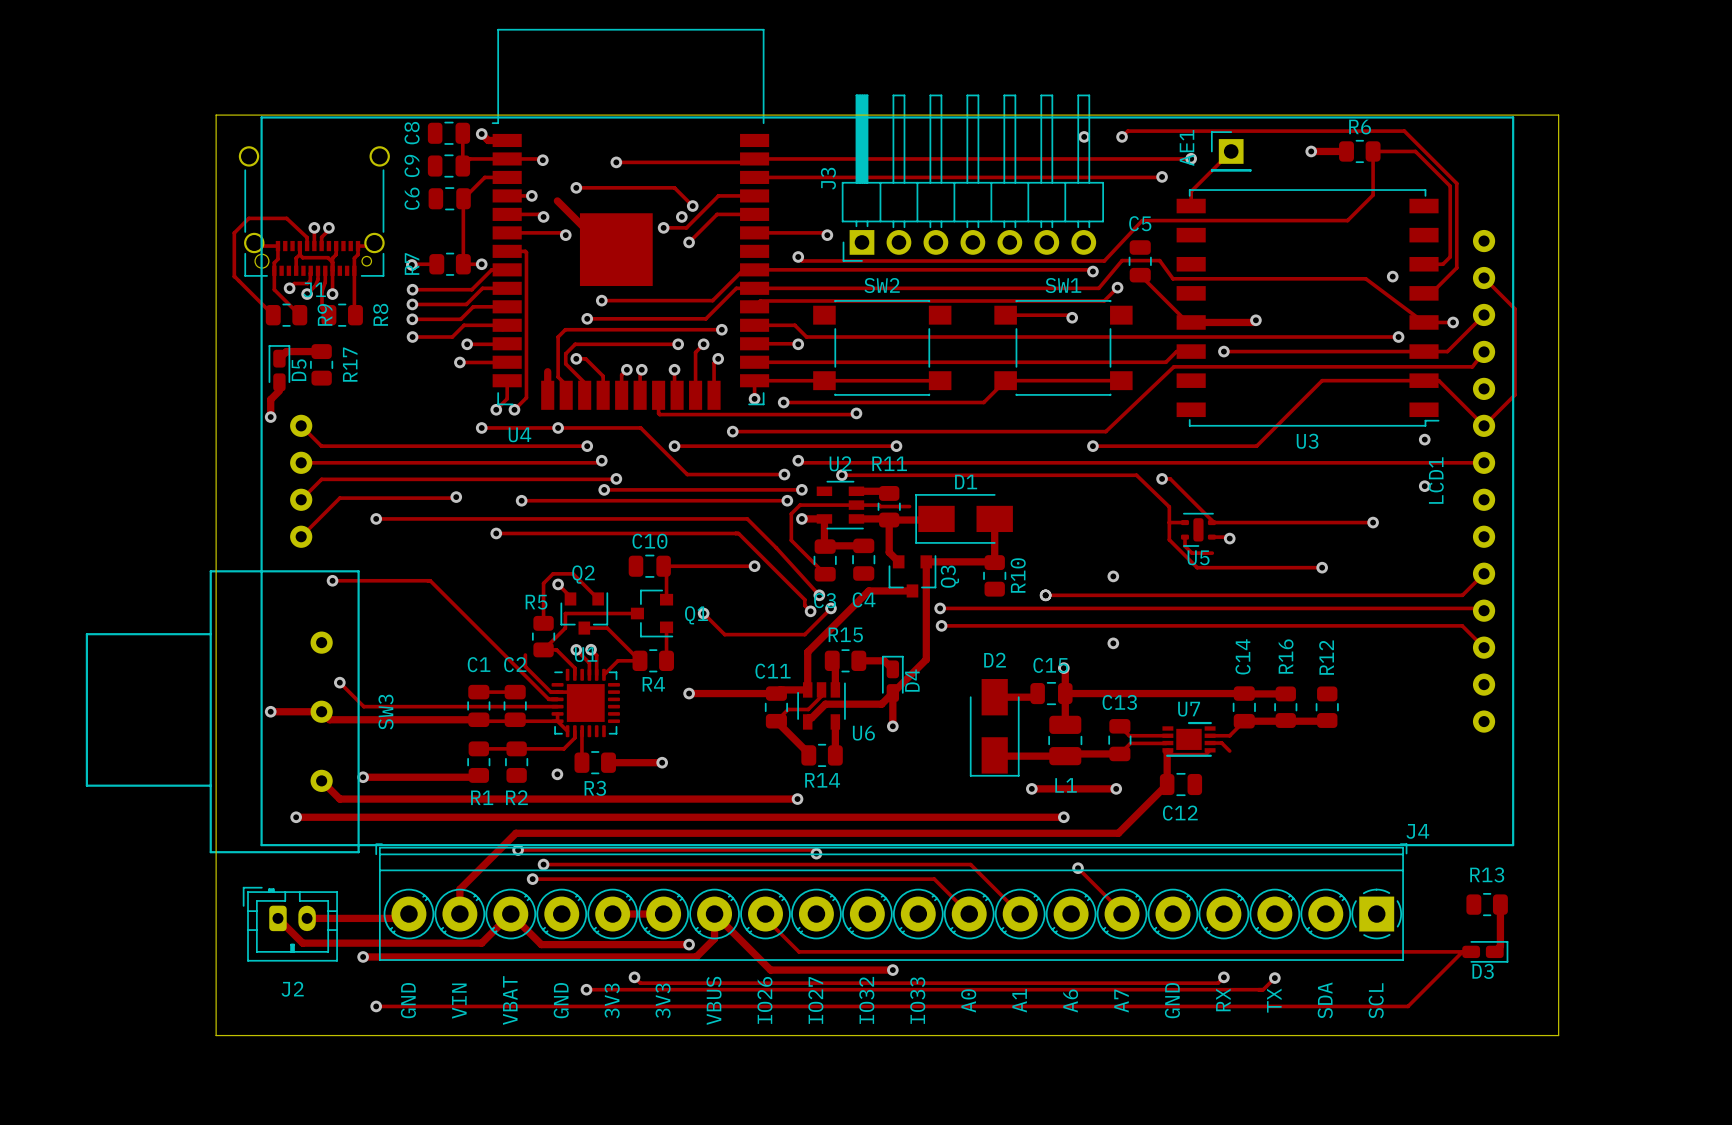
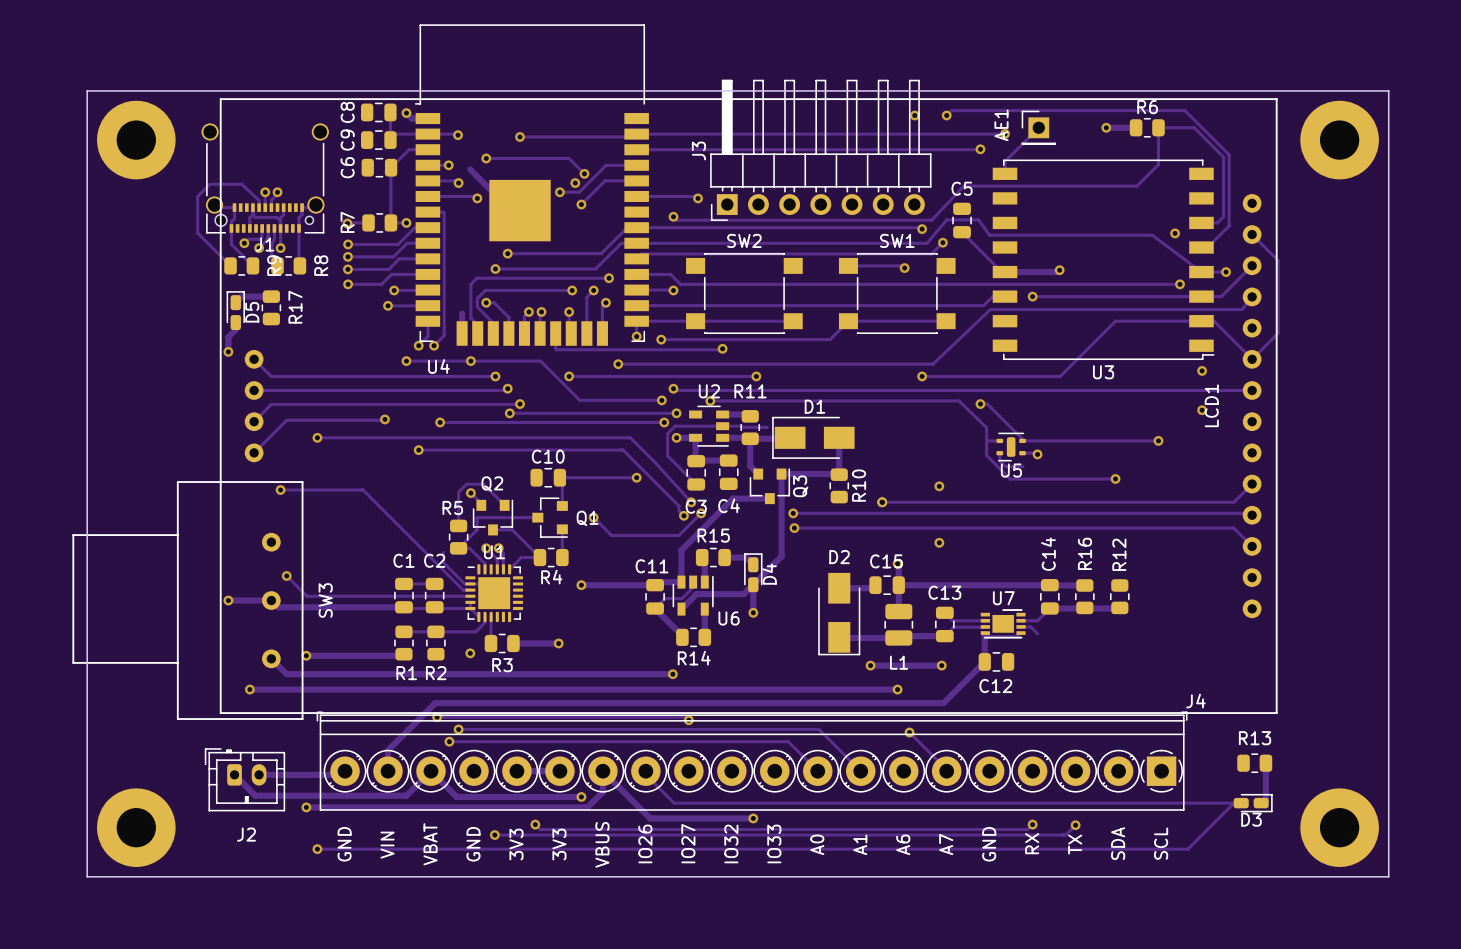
board edge: (216, 115) (216, 1035) (1558, 1035) (1558, 115) (216, 115) -> (87, 90) (87, 876) (1388, 876) (1388, 90) (87, 90)
part: none -> (136, 140)
part: none -> (1339, 140)
part: none -> (136, 827)
part: none -> (1339, 827)

